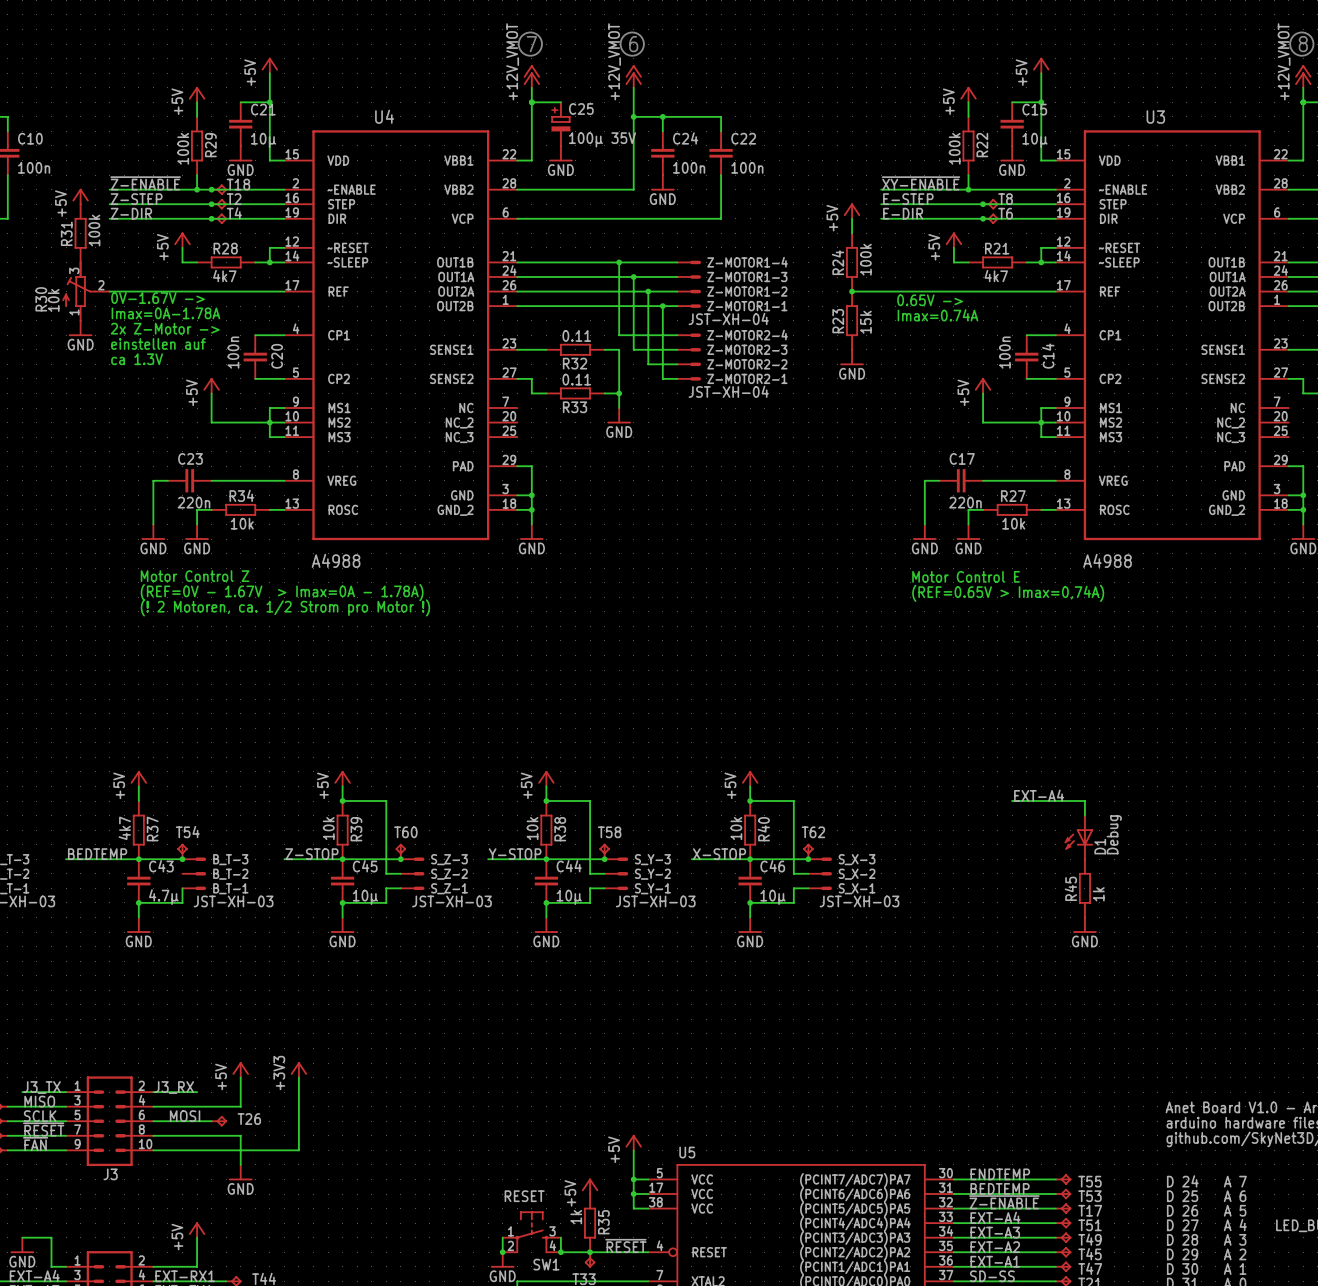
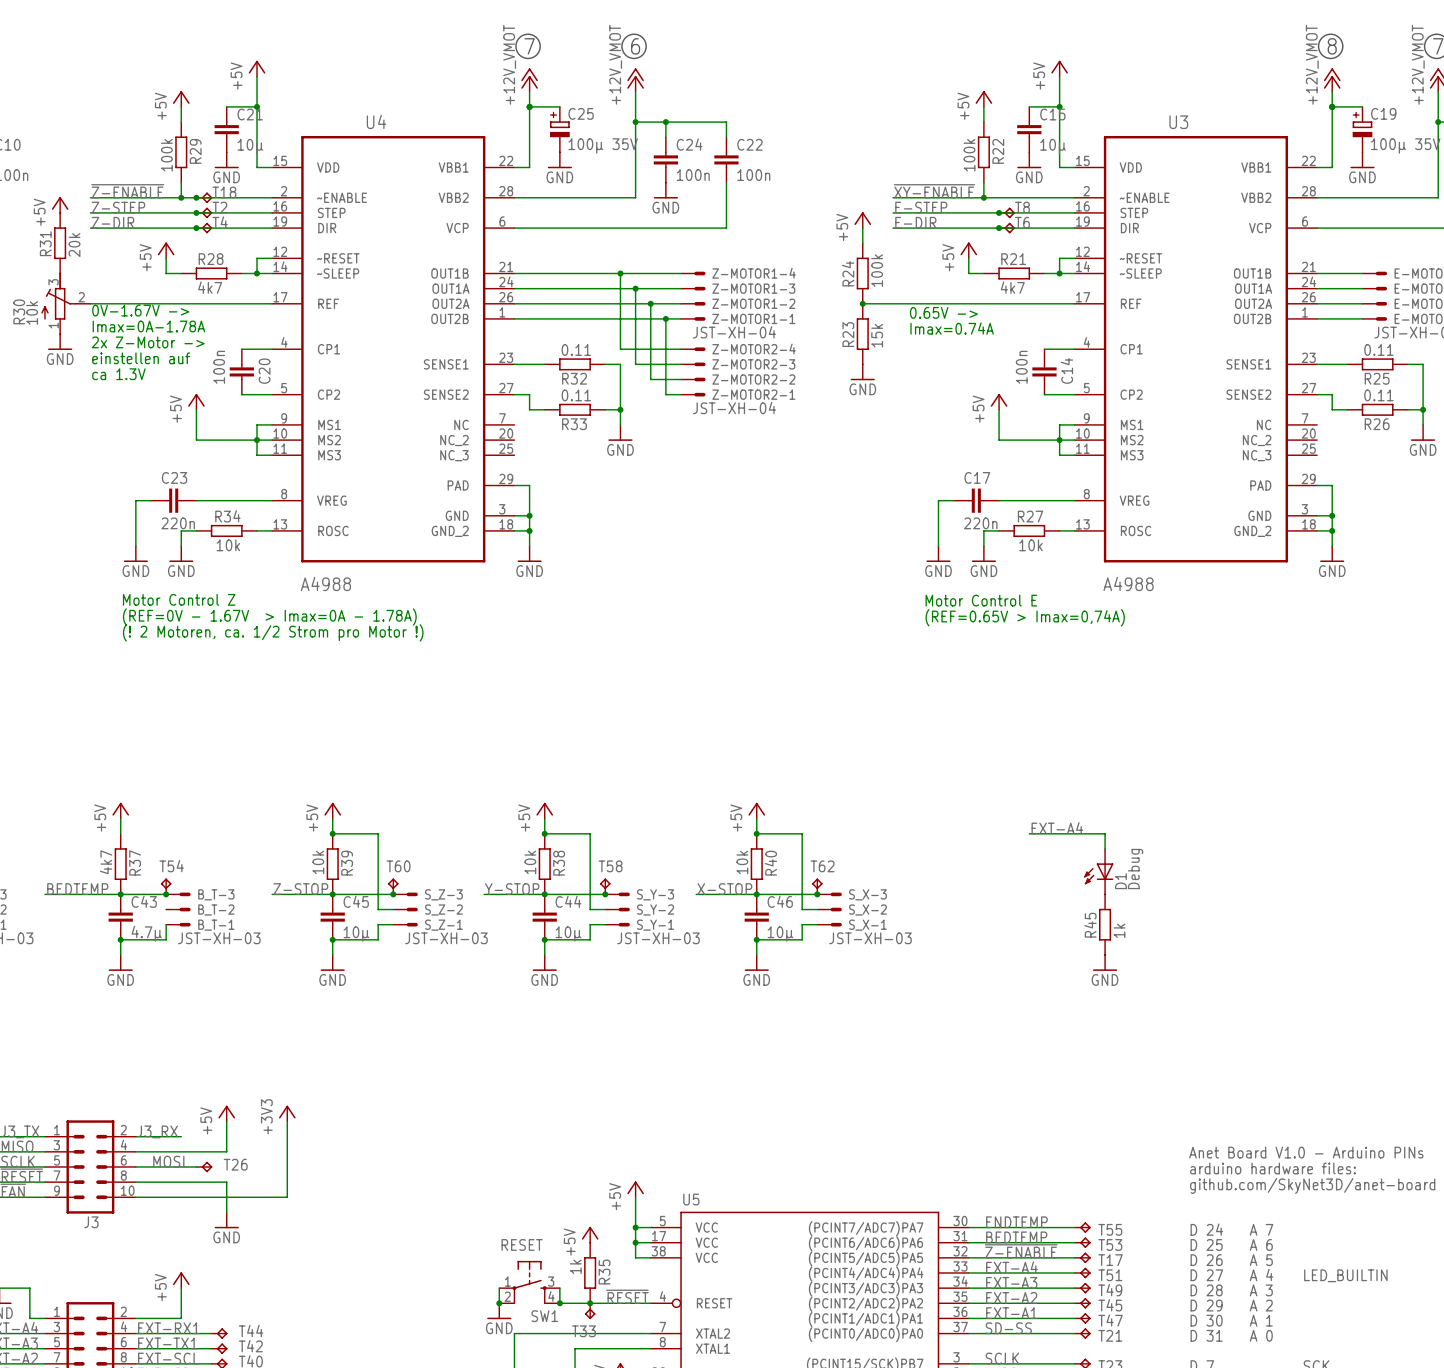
R31 value: 100k (94, 230) -> 20k (74, 245)

